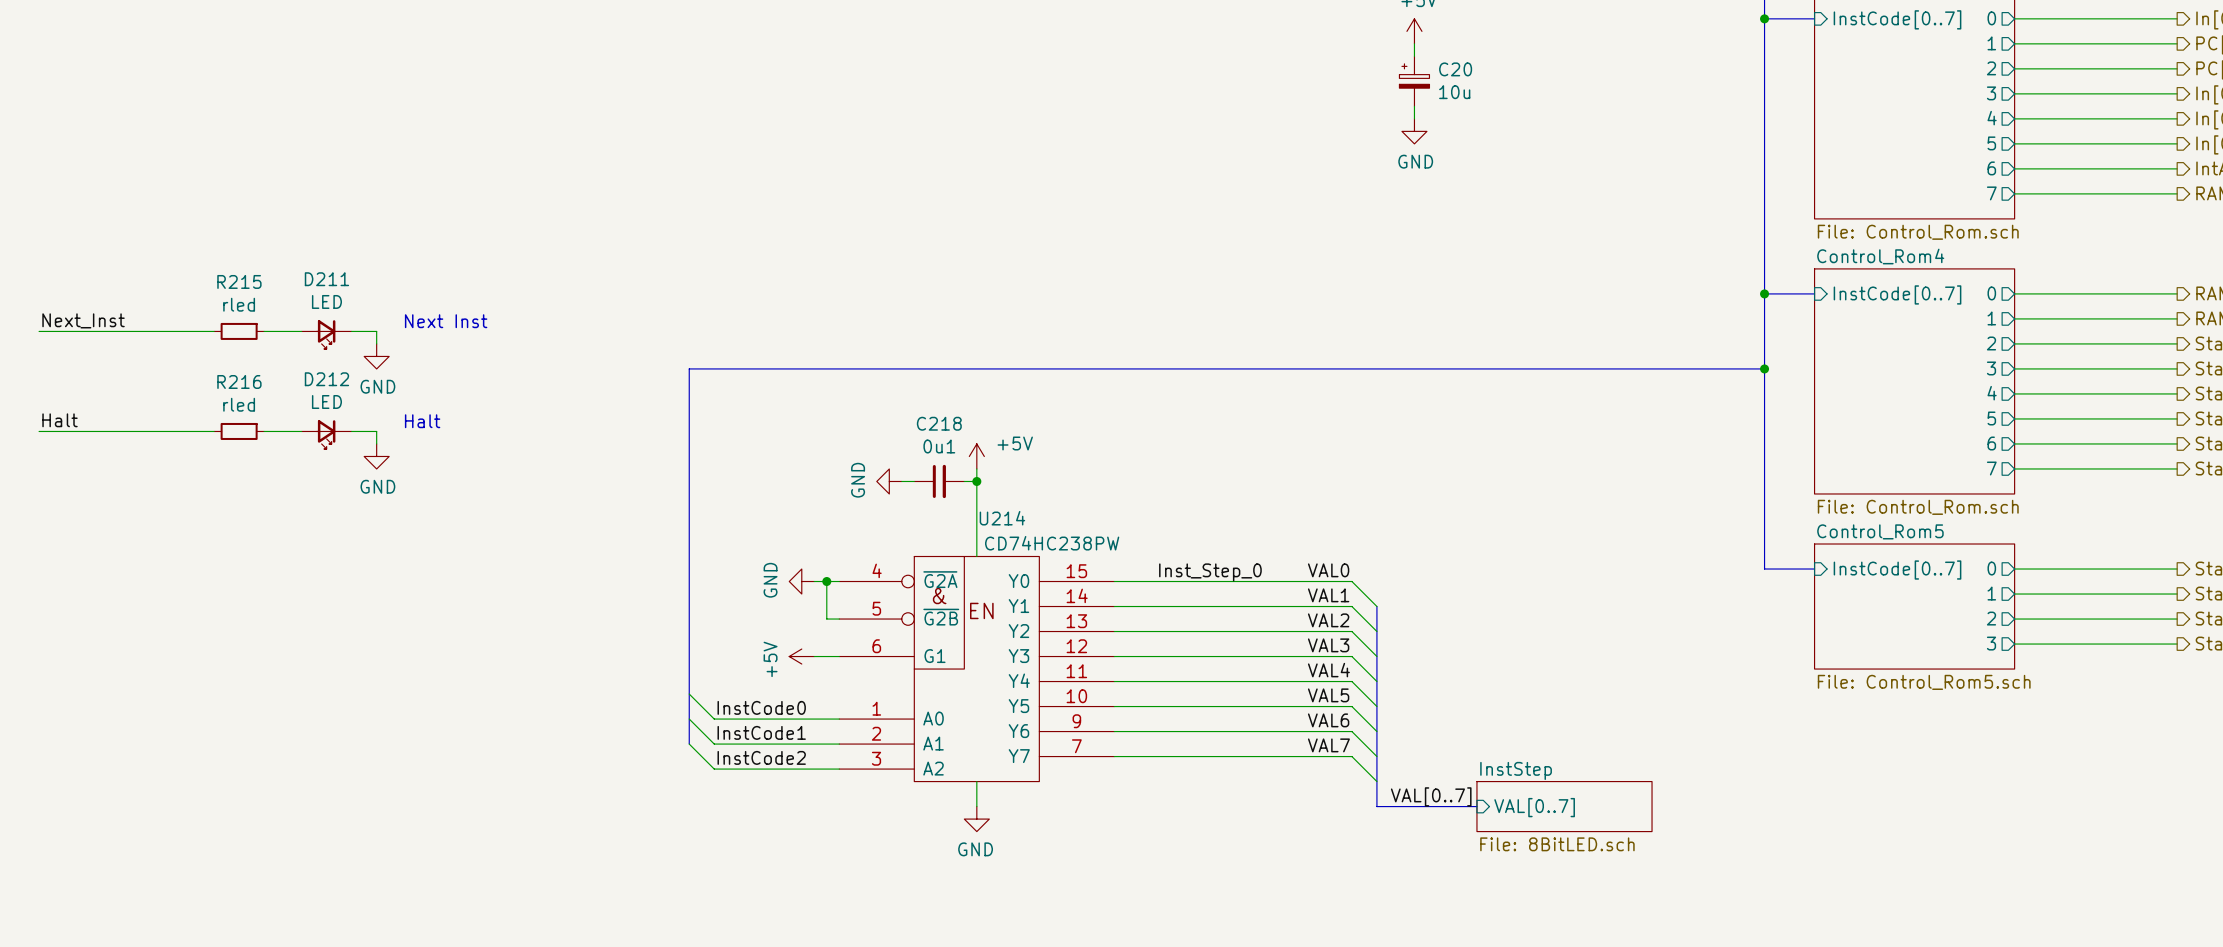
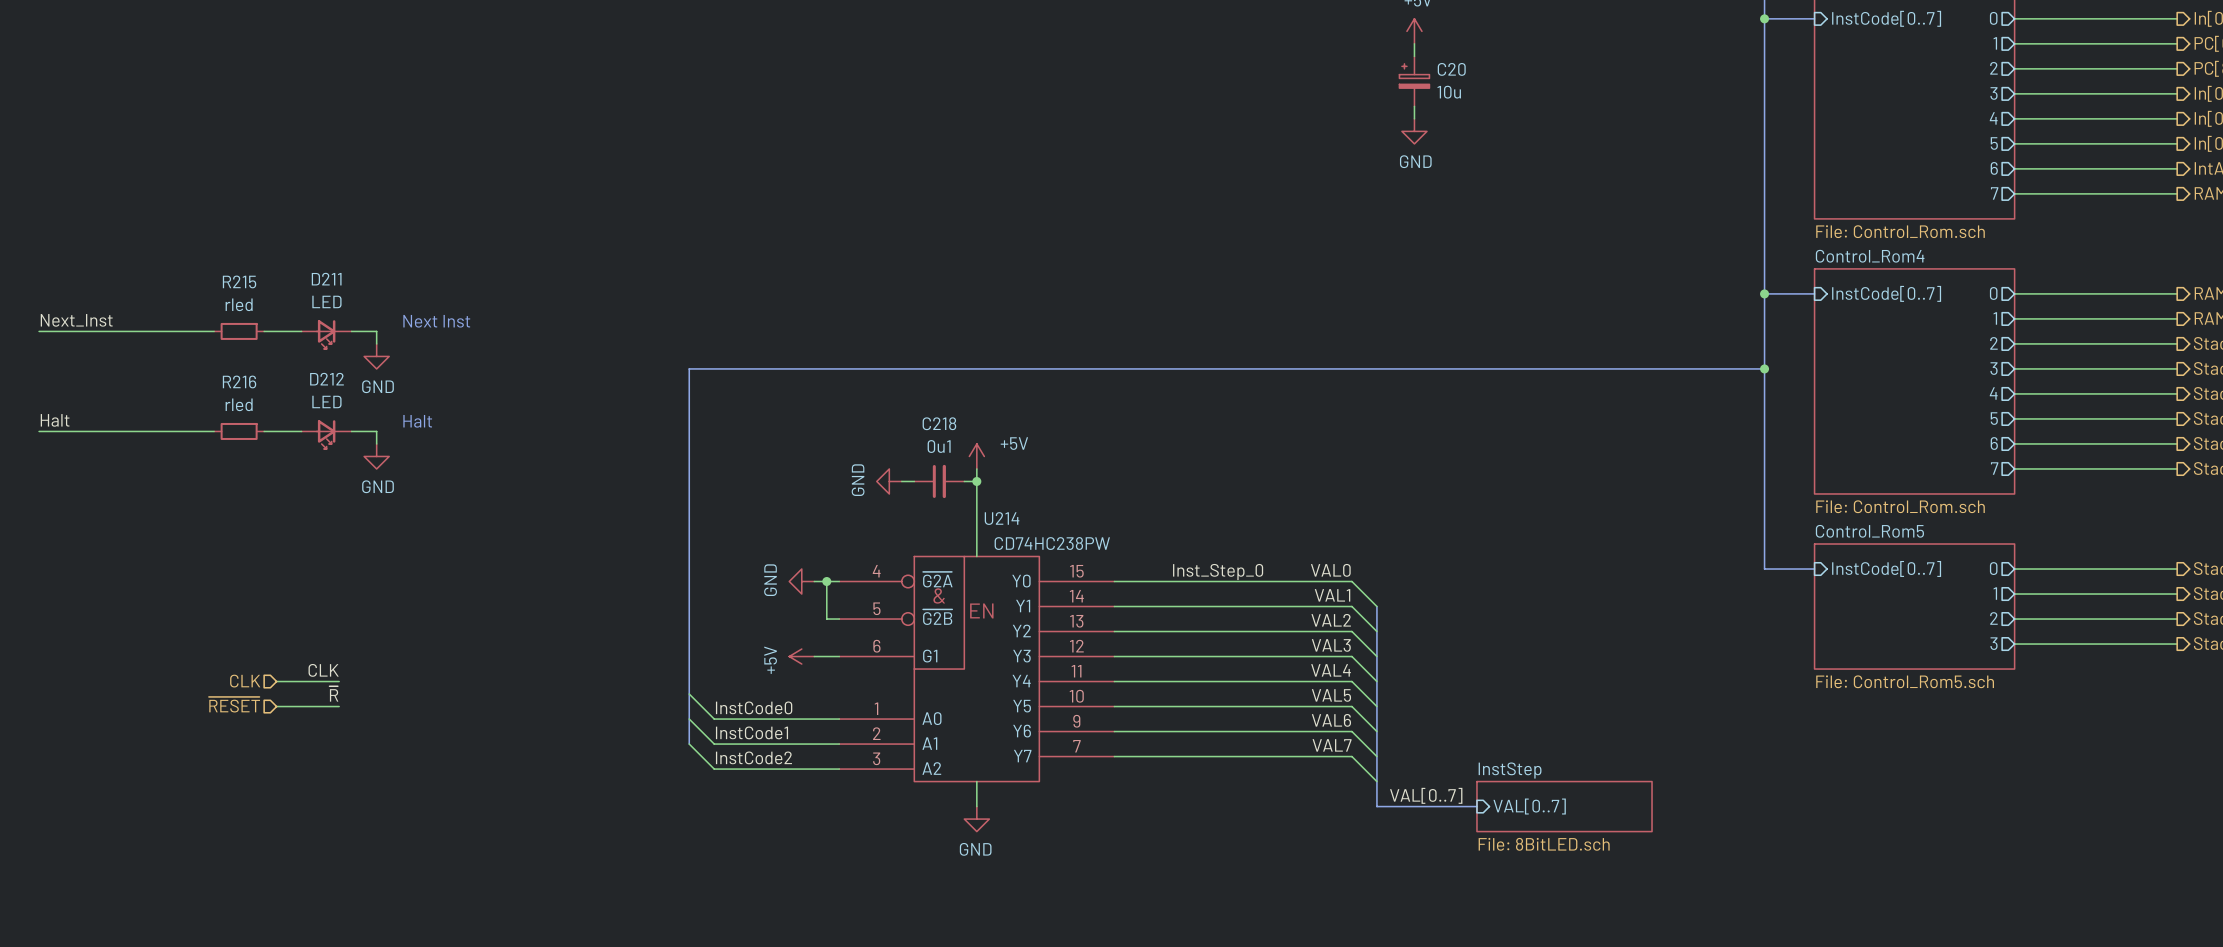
label: none -> CLK (323, 670)
hierarchical label: none -> CLK (245, 681)
wire: none -> (276, 681) (339, 681)
label: none -> ~{R} (333, 693)
hierarchical label: none -> ~{RESET} (234, 704)
wire: none -> (276, 706) (339, 706)

